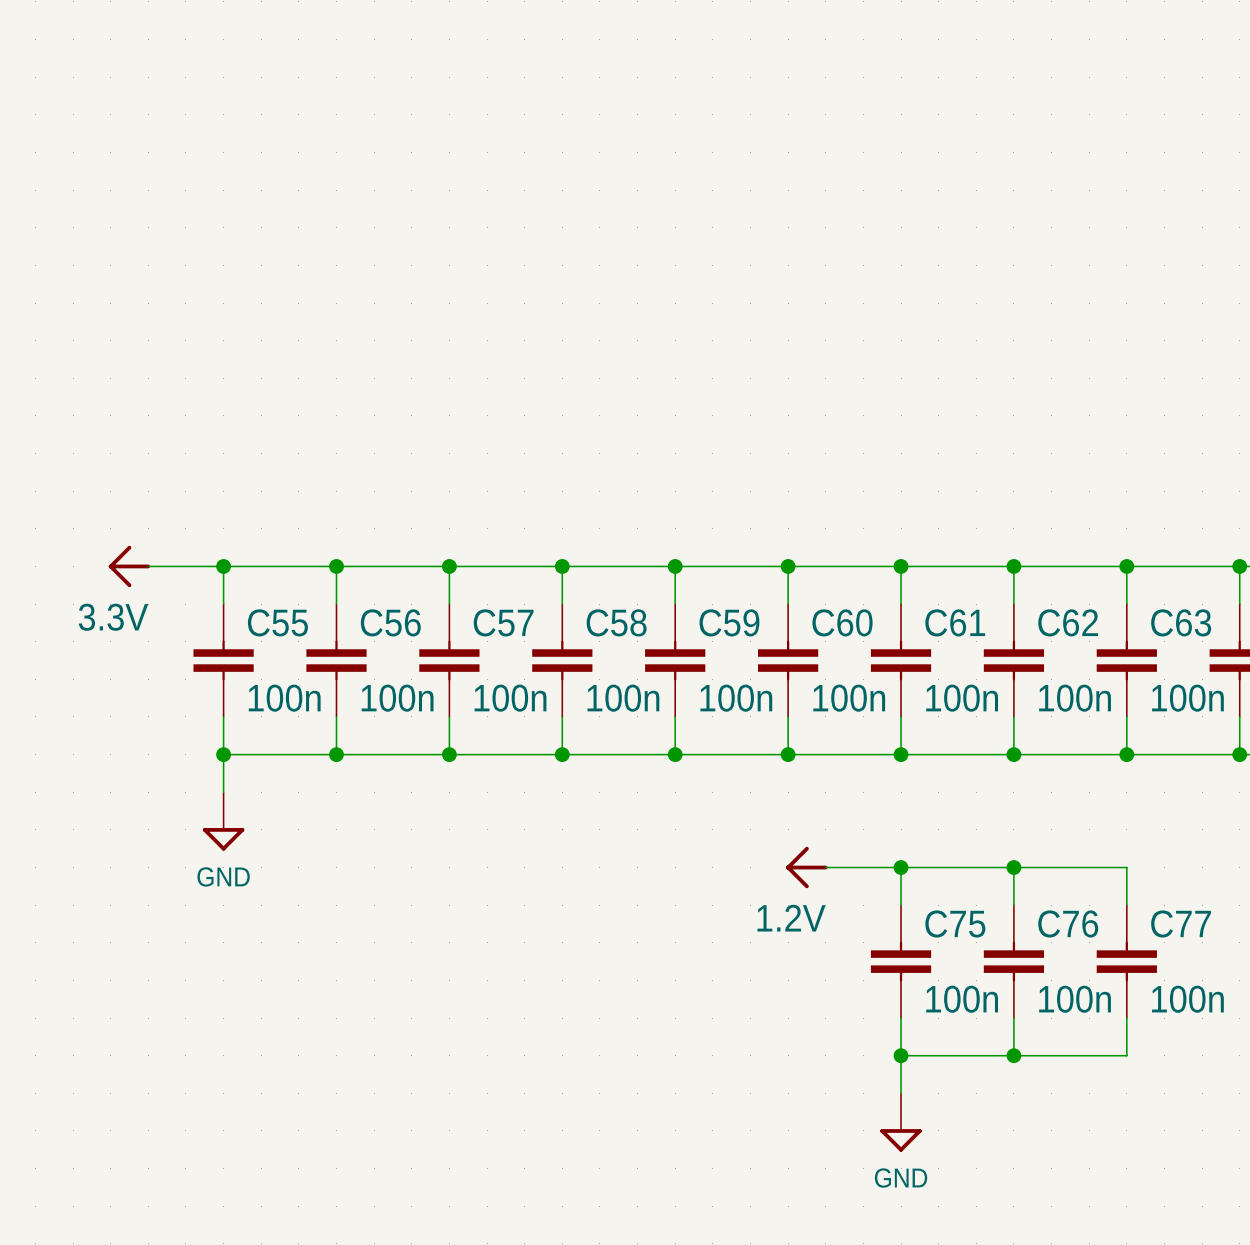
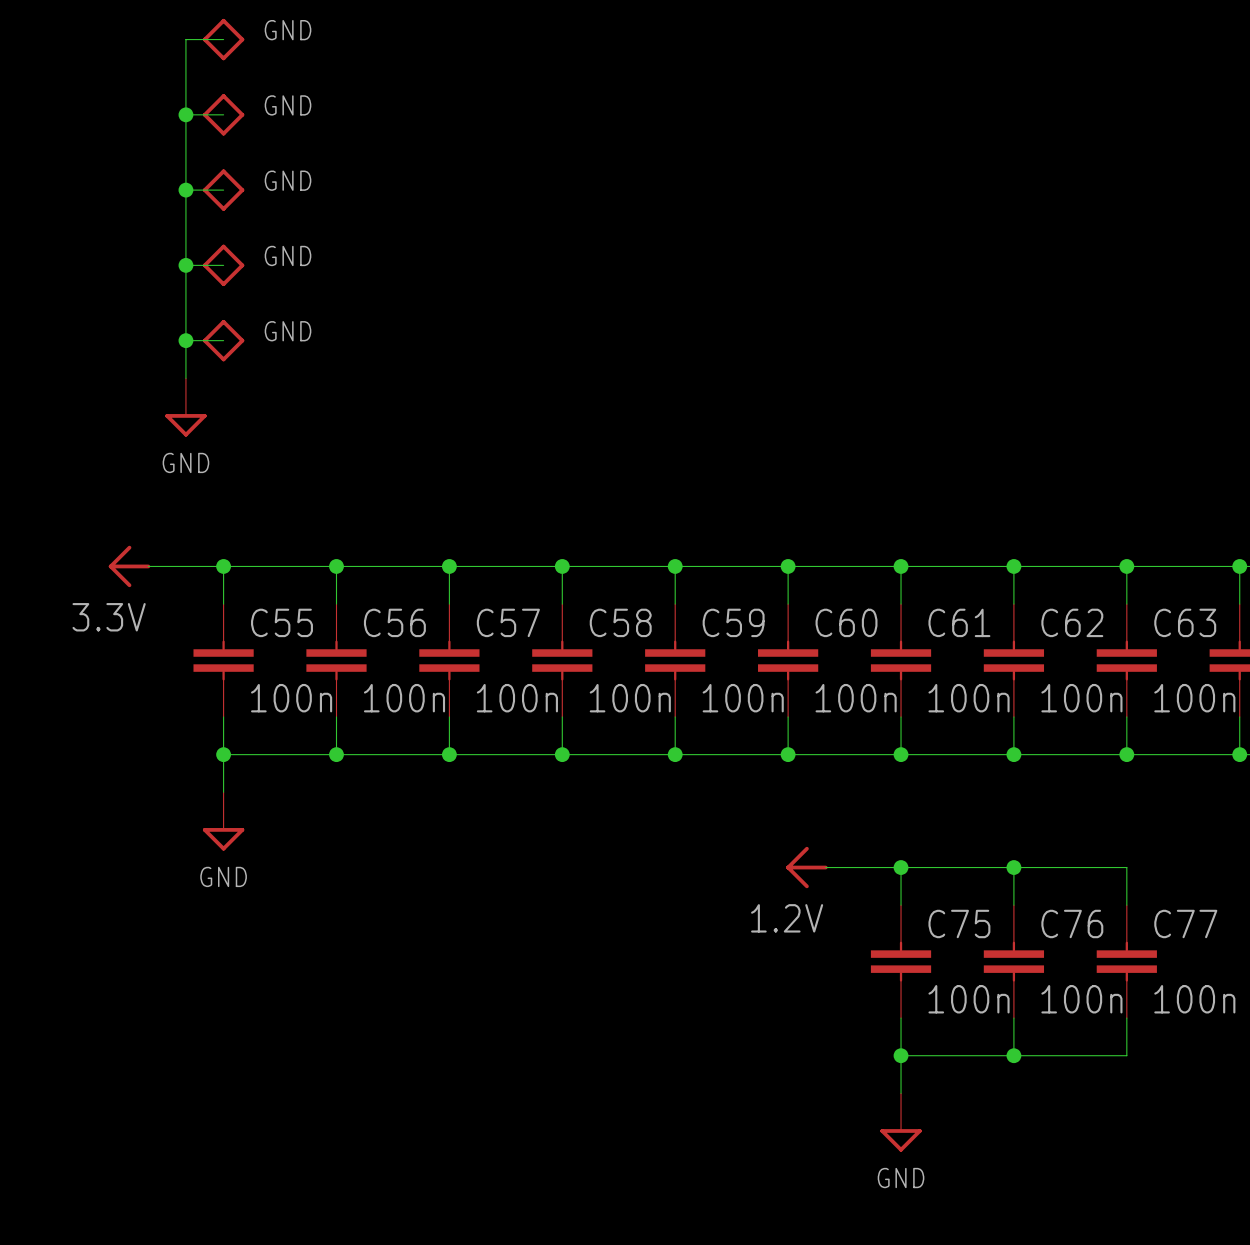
wire: none -> (223, 39) (185, 39) (185, 378)
part: none -> GND (223, 39)
wire: none -> (185, 114) (223, 114)
junction: none -> (185, 114)
part: none -> GND (223, 114)
wire: none -> (185, 190) (223, 190)
junction: none -> (185, 190)
part: none -> GND (223, 190)
wire: none -> (185, 265) (223, 265)
junction: none -> (185, 265)
part: none -> GND (223, 265)
wire: none -> (185, 340) (223, 340)
junction: none -> (185, 340)
part: none -> GND (223, 340)
power symbol: none -> GND (185, 407)

